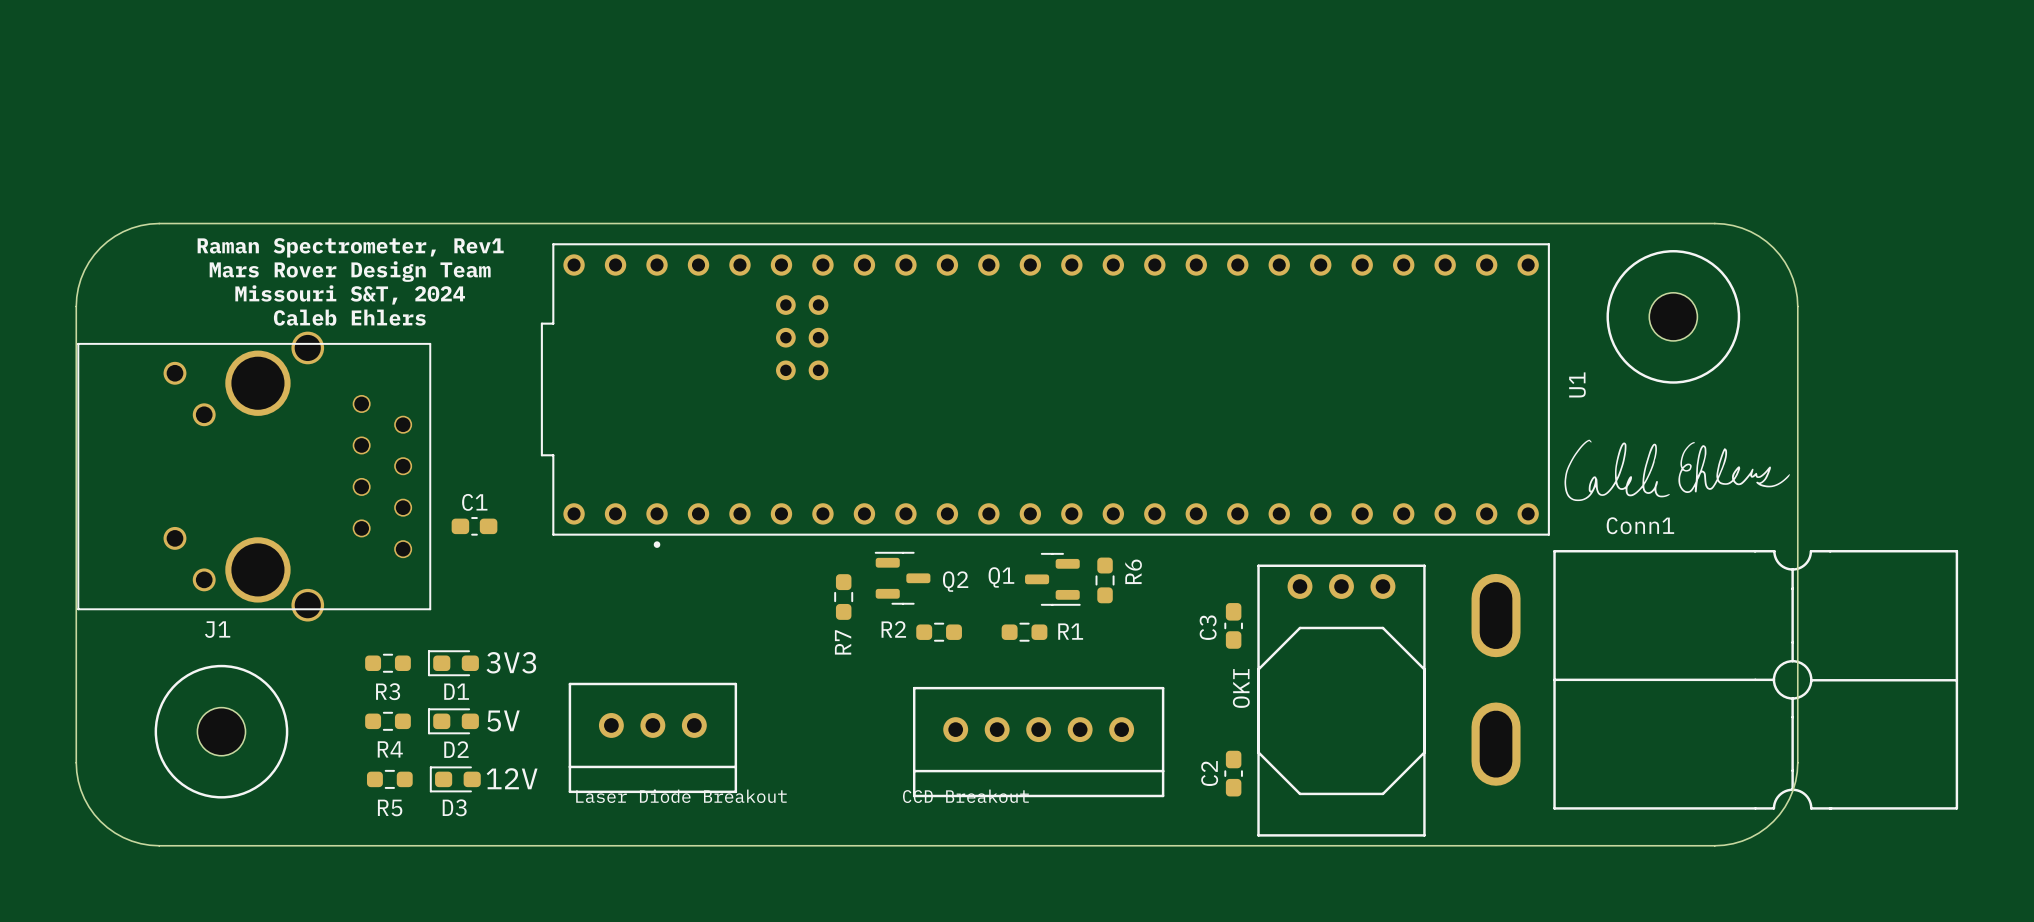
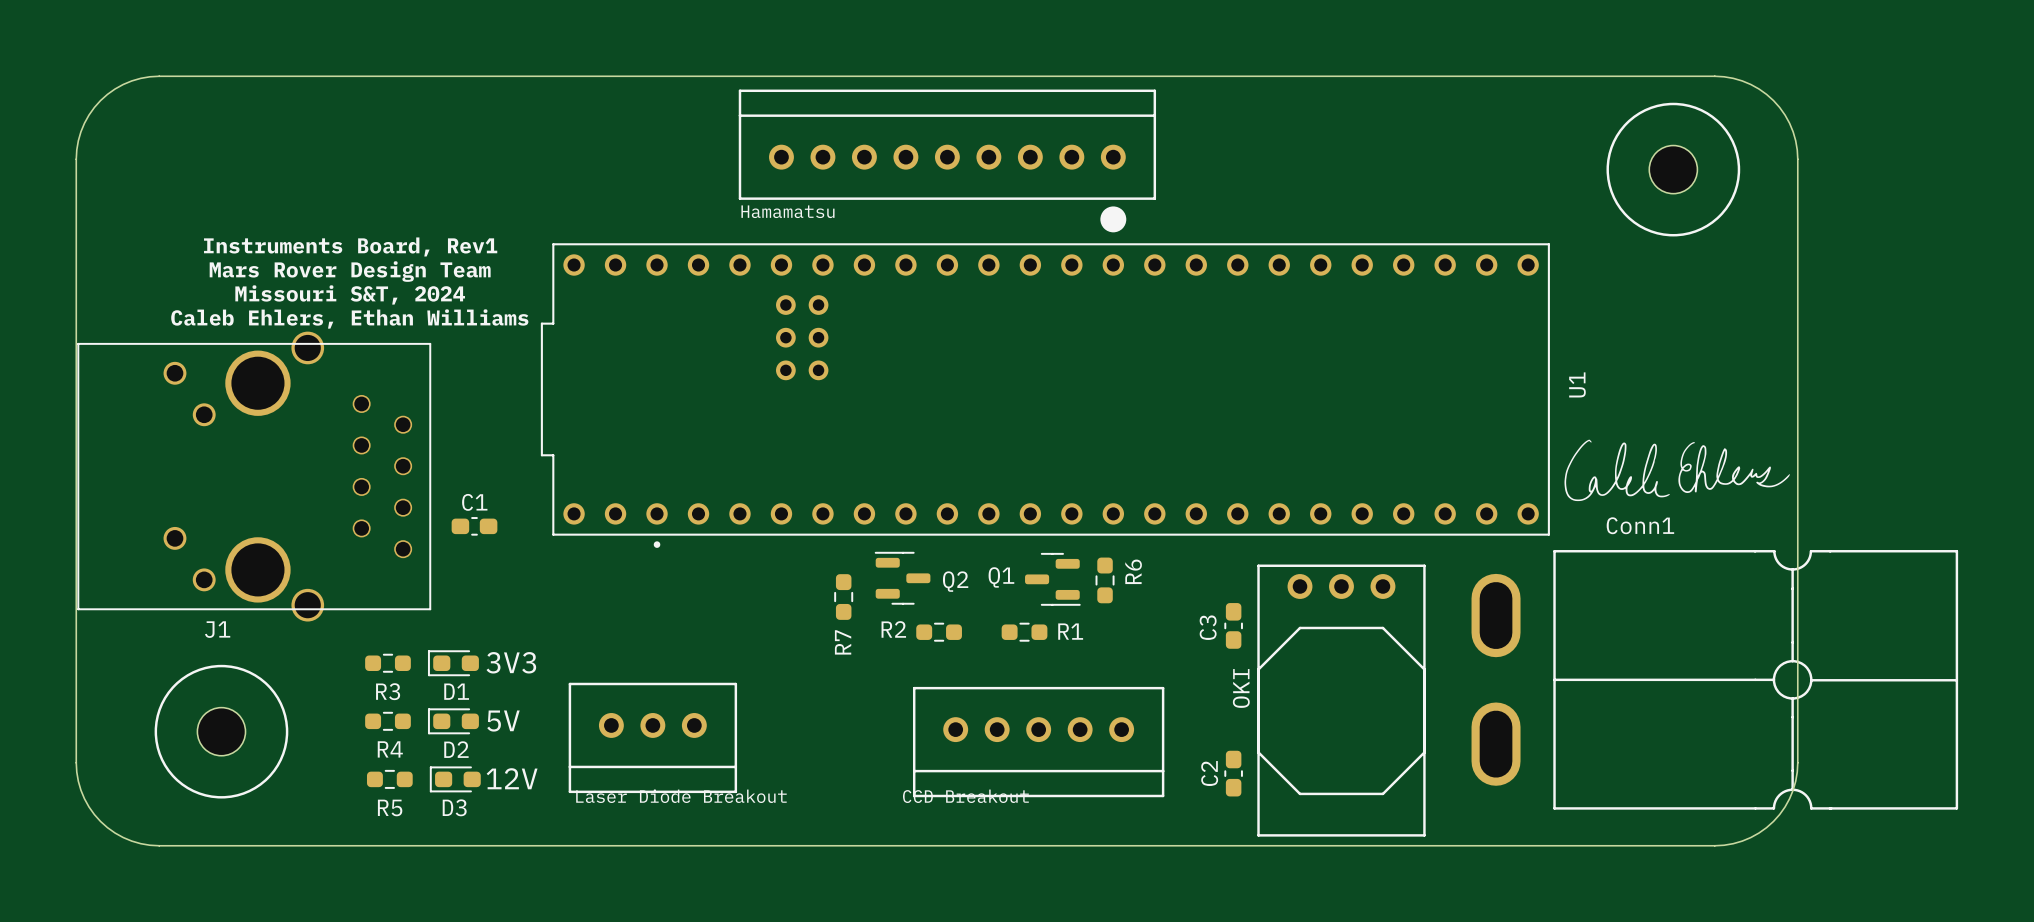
part: none -> (947, 144)
drawing: none -> [1100, 206, 1127, 233]
text: none -> Hamamatsu (787, 211)
text: Raman Spectrometer, Rev1 (350, 247) -> Instruments Board, Rev1 (350, 246)
board edge: (76, 306) (78, 288) (84, 270) (100, 247) (115, 236) (131, 228) (159, 223) (1714, 223) (1733, 225) (1750, 231) (1773, 247) (1789, 270) (1795, 288) (1797, 306) -> (76, 306) (76, 159) (80, 131) (94, 107) (115, 88) (140, 78) (159, 76) (1724, 76) (1750, 84) (1766, 94) (1785, 115) (1793, 131) (1797, 159) (1797, 306)
part position: (1673, 316) -> (1673, 169)
text: Caleb Ehlers (349, 317) -> Caleb Ehlers, Ethan Williams (349, 318)

